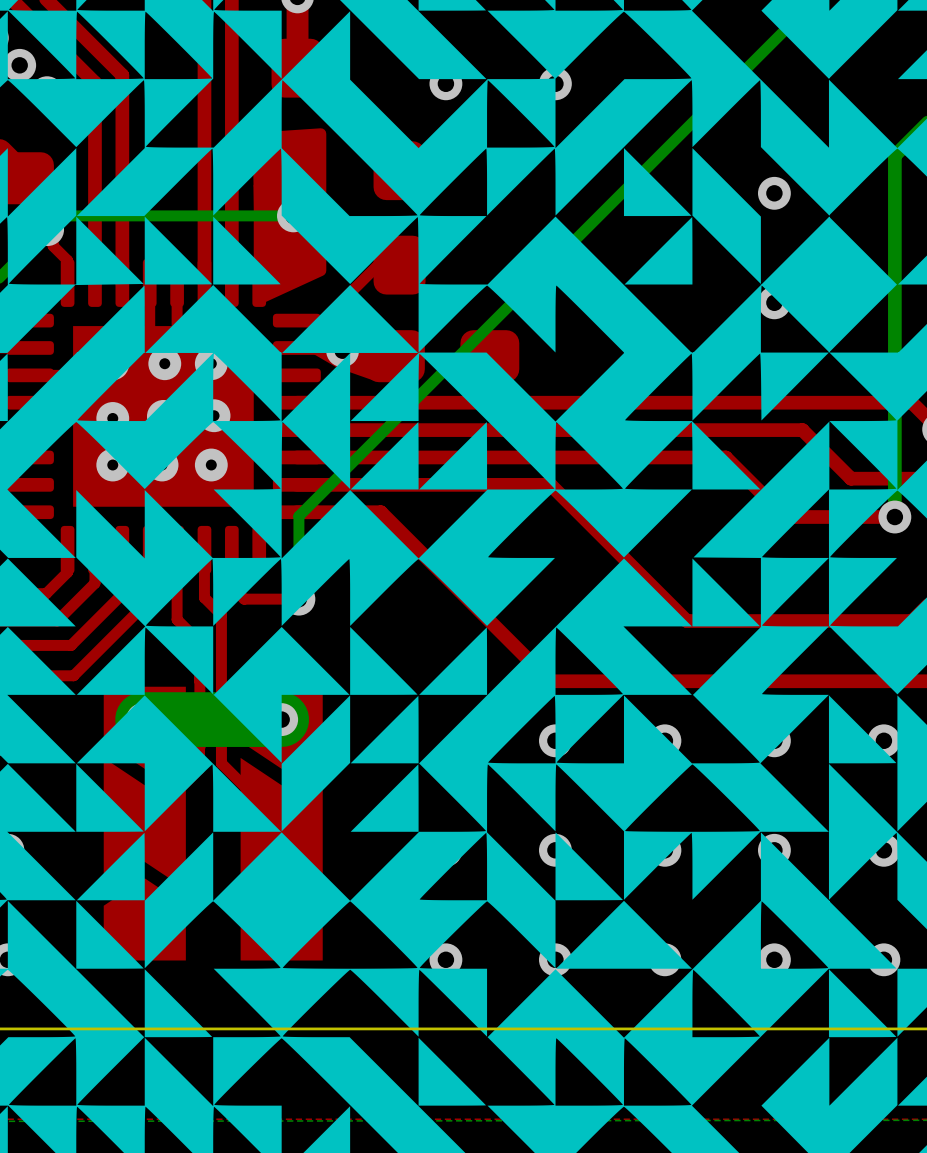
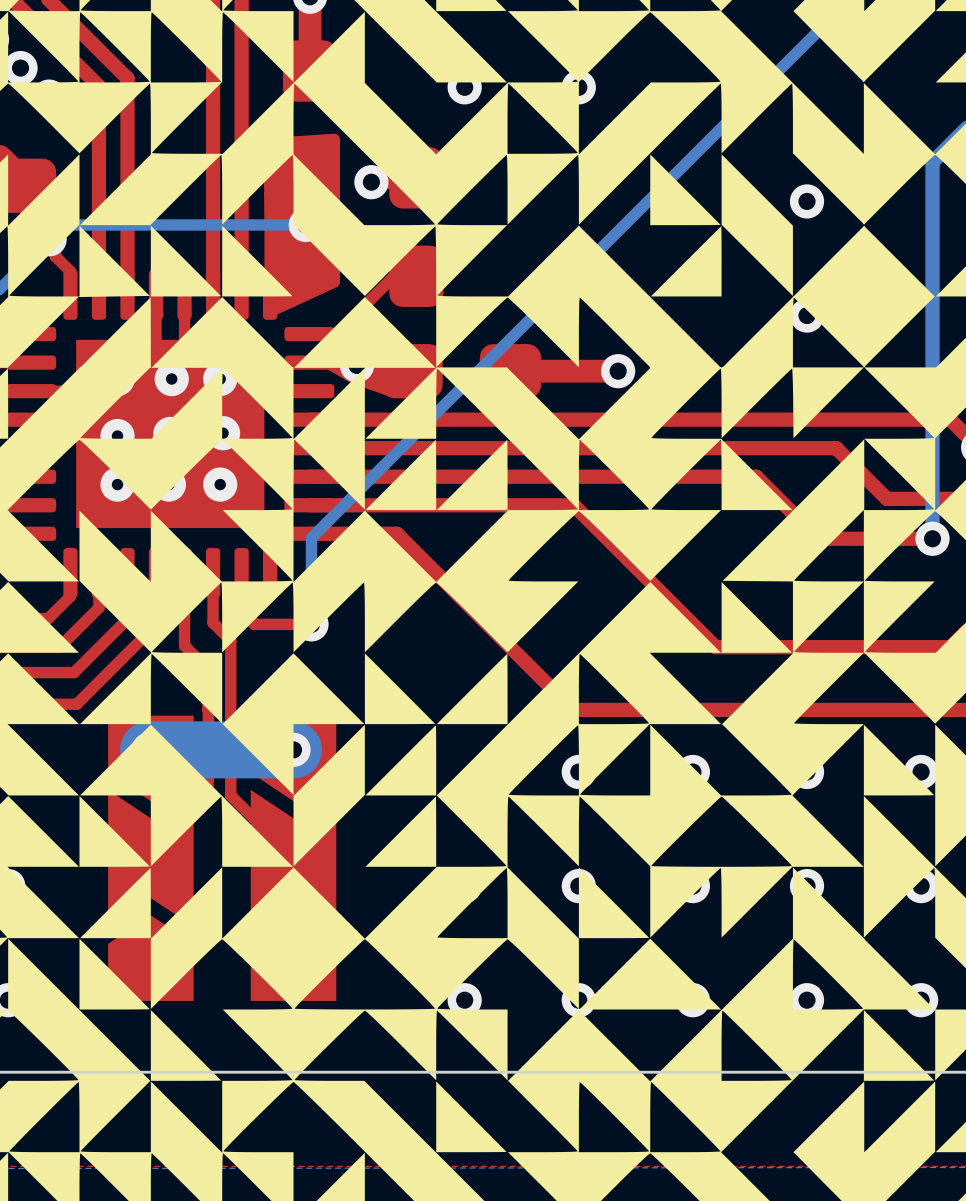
via: none -> (371, 182)
top track: none -> (618, 371) (520, 371)
via: none -> (618, 371)

